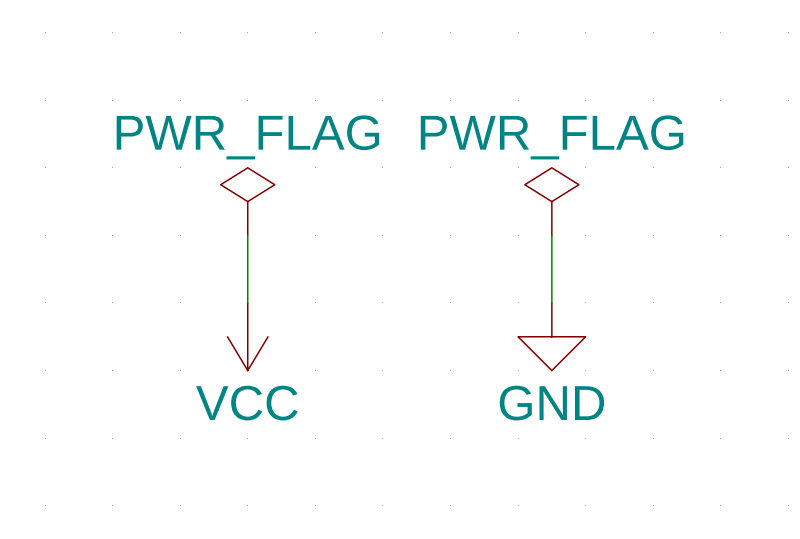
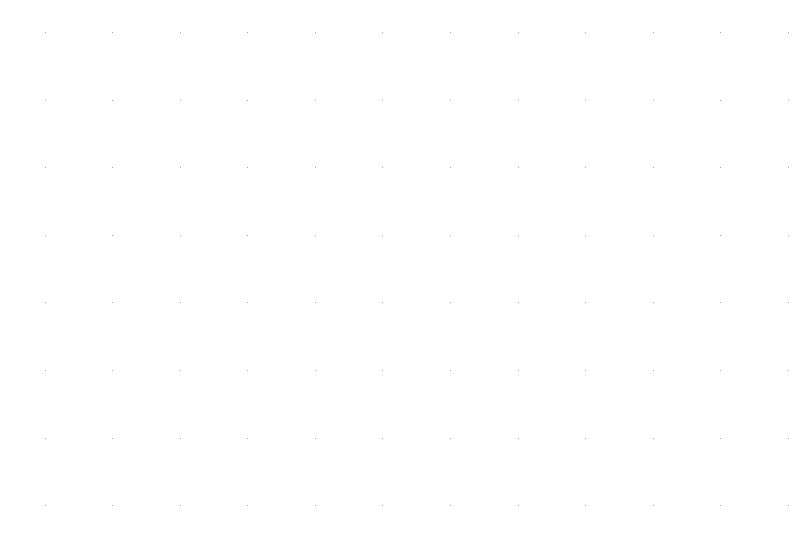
power symbol: PWR_FLAG (247, 201) -> none
power symbol: PWR_FLAG (551, 201) -> none
wire: (247, 235) (247, 302) -> none
wire: (551, 235) (551, 302) -> none
power symbol: VCC (247, 336) -> none
power symbol: GND (551, 336) -> none

